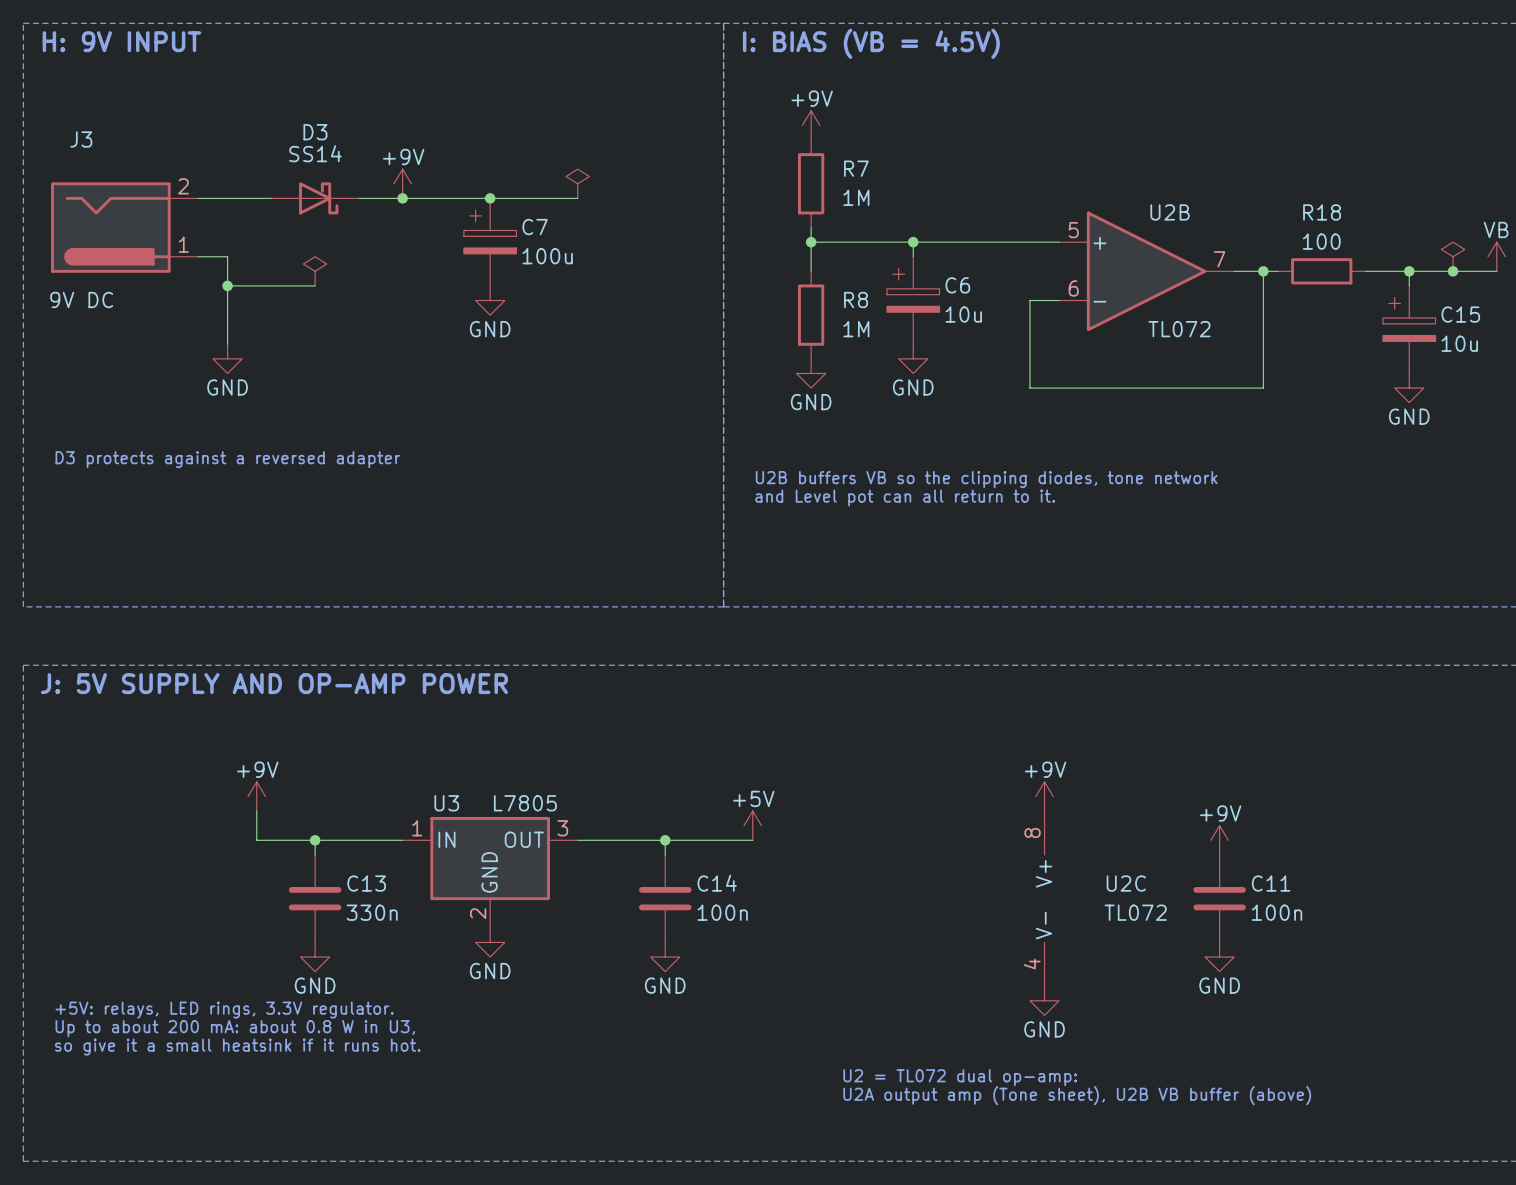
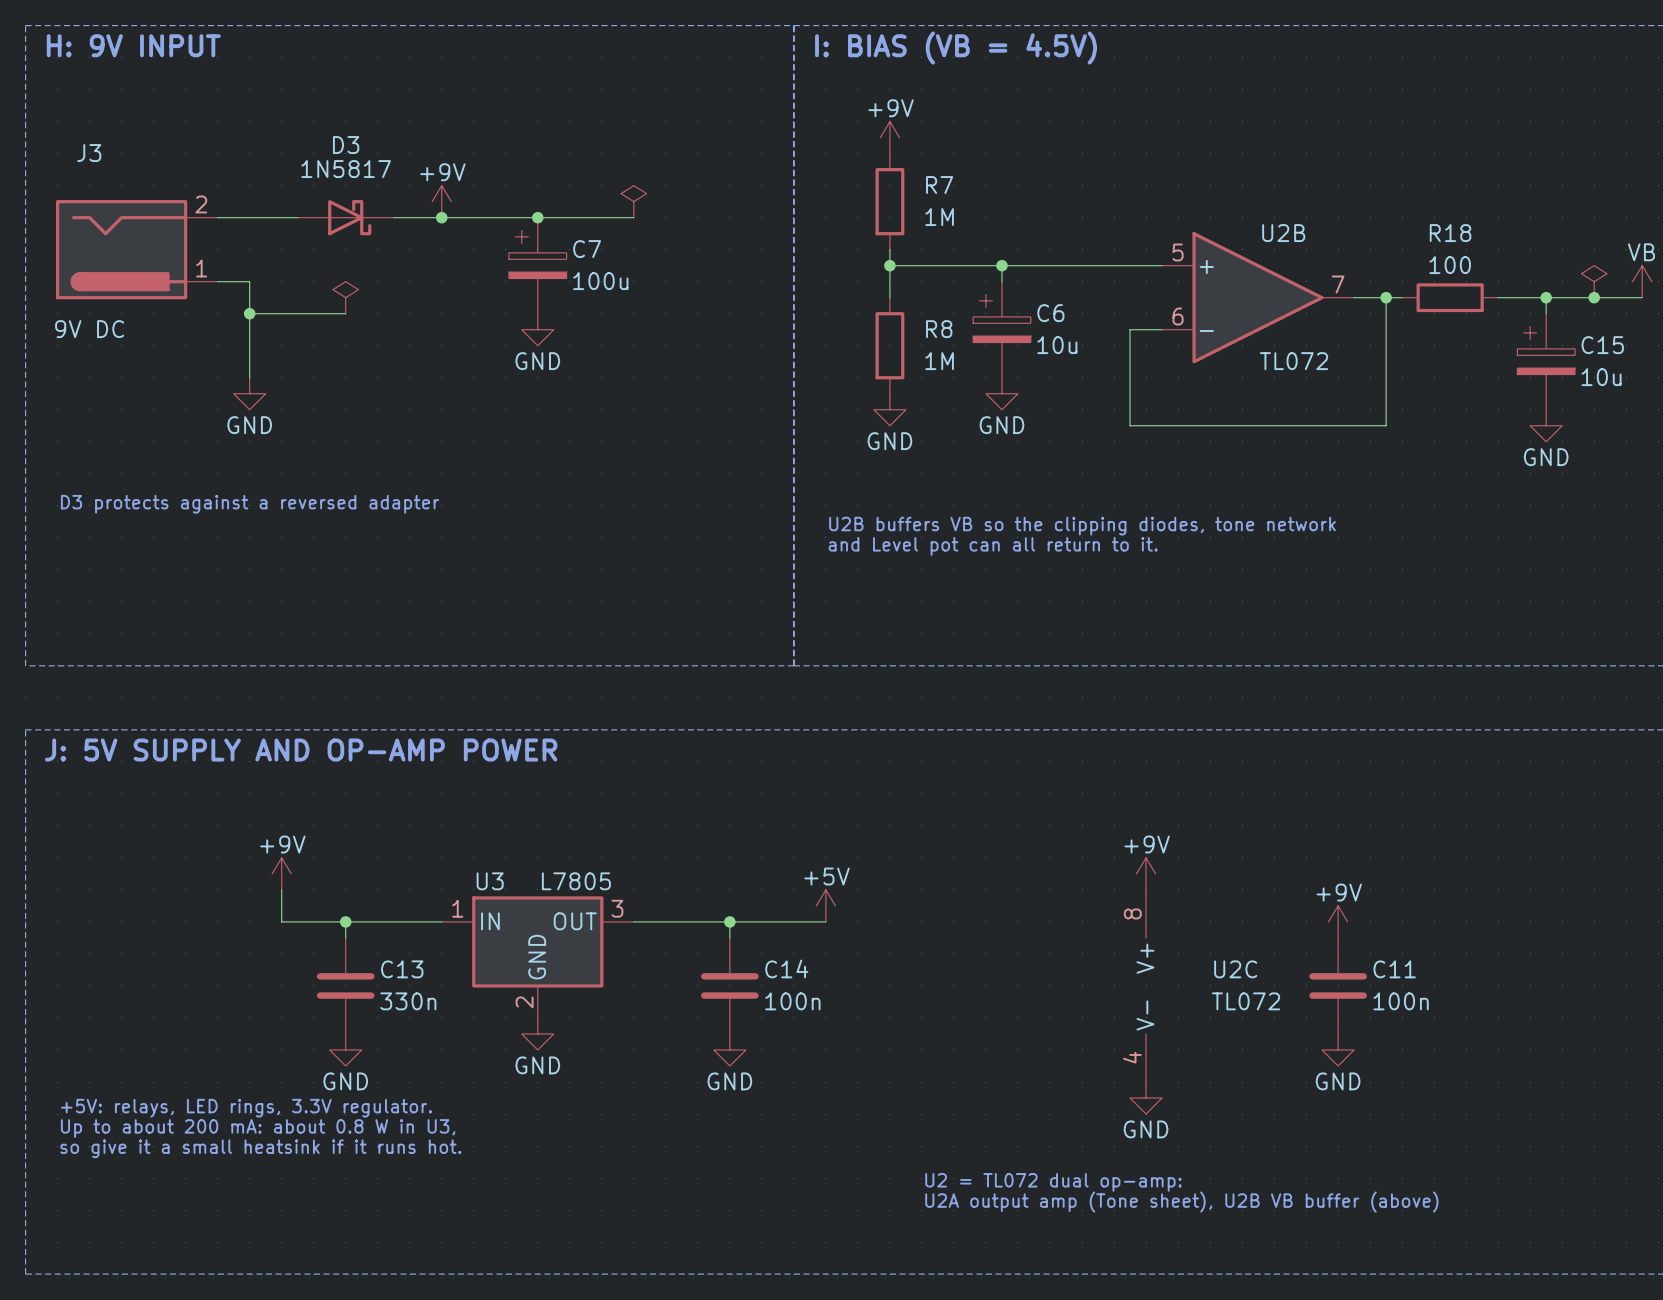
D3 value: SS14 (315, 153) -> 1N5817 (346, 169)

